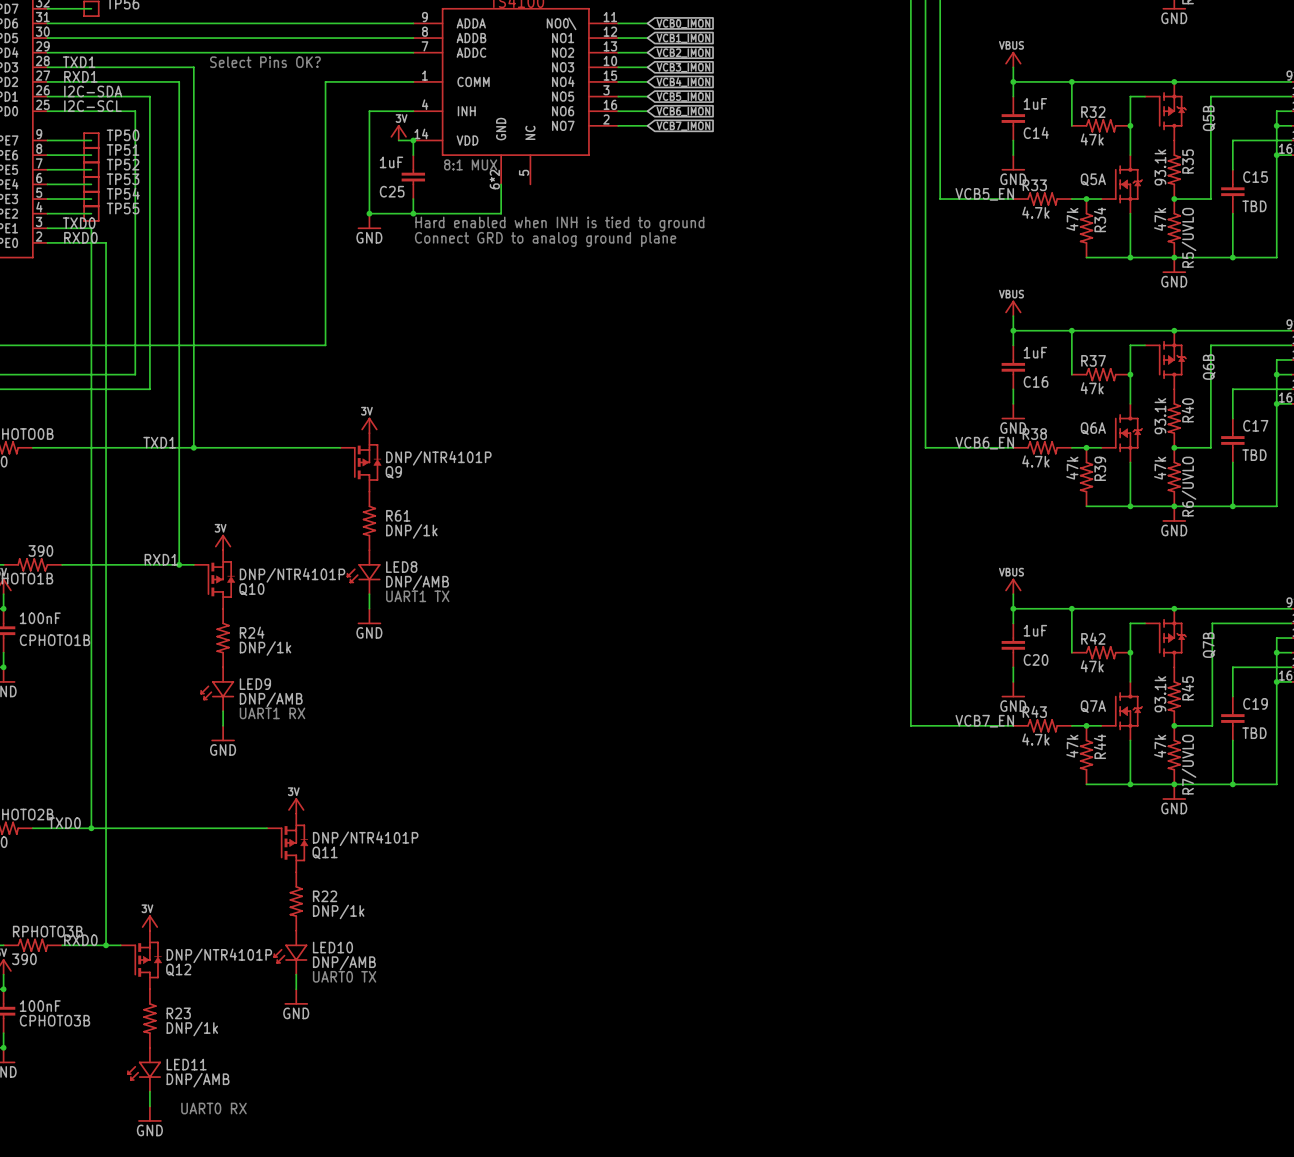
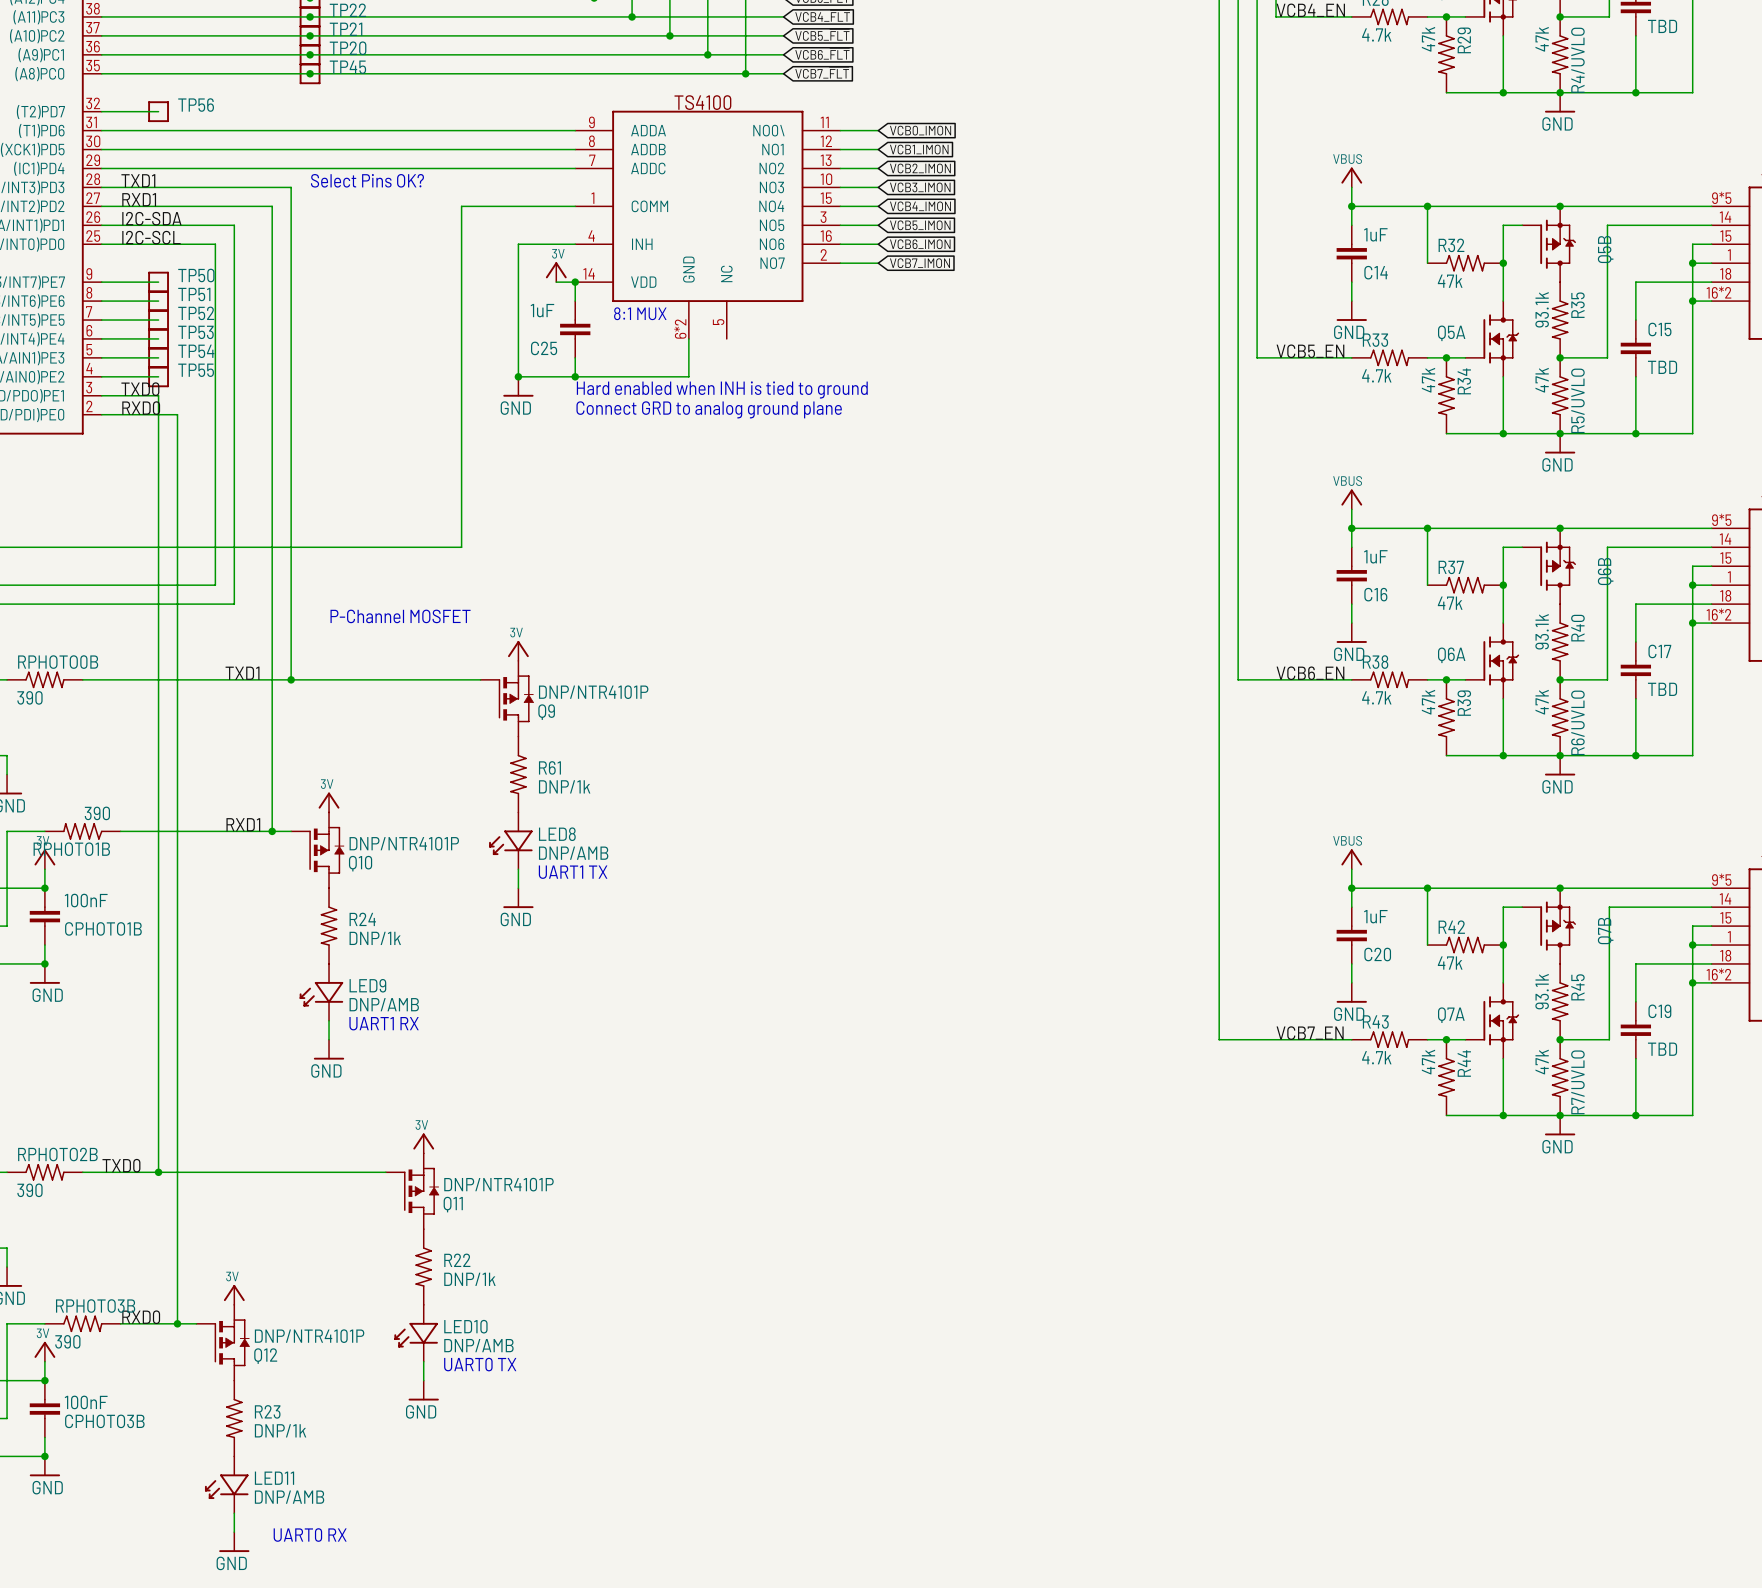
text: none -> P-Channel MOSFET (400, 616)

